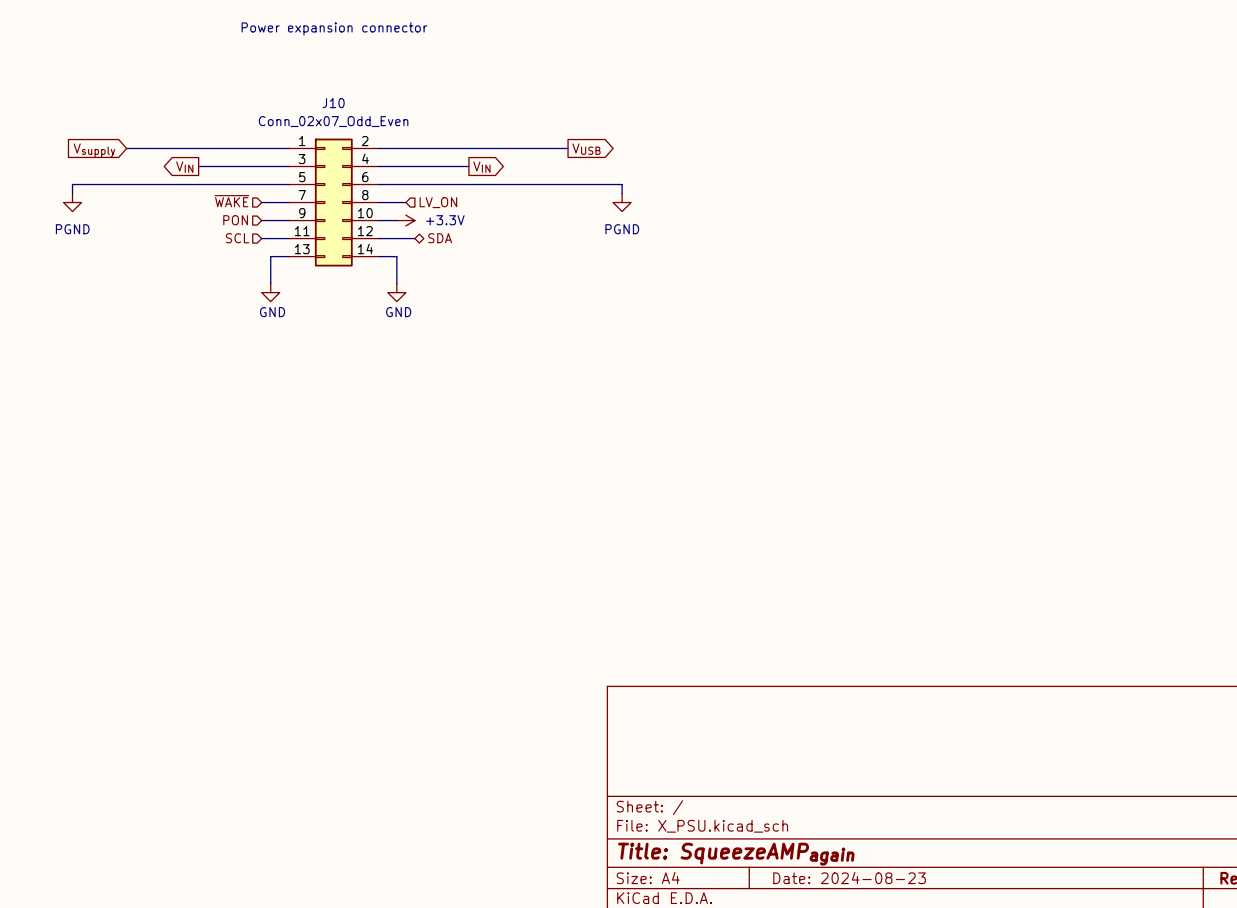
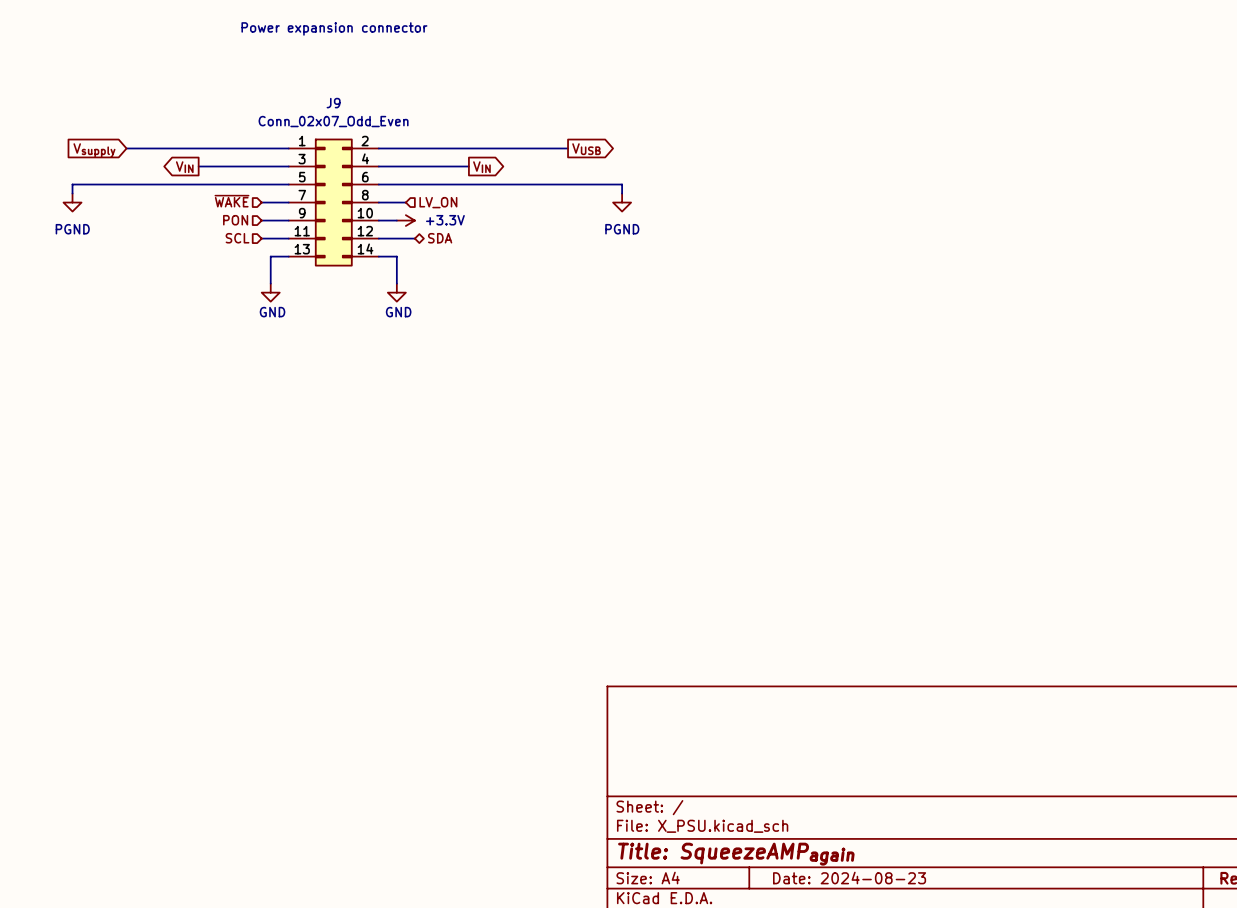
J10 name: J10 (333, 103) -> J9 (333, 103)

